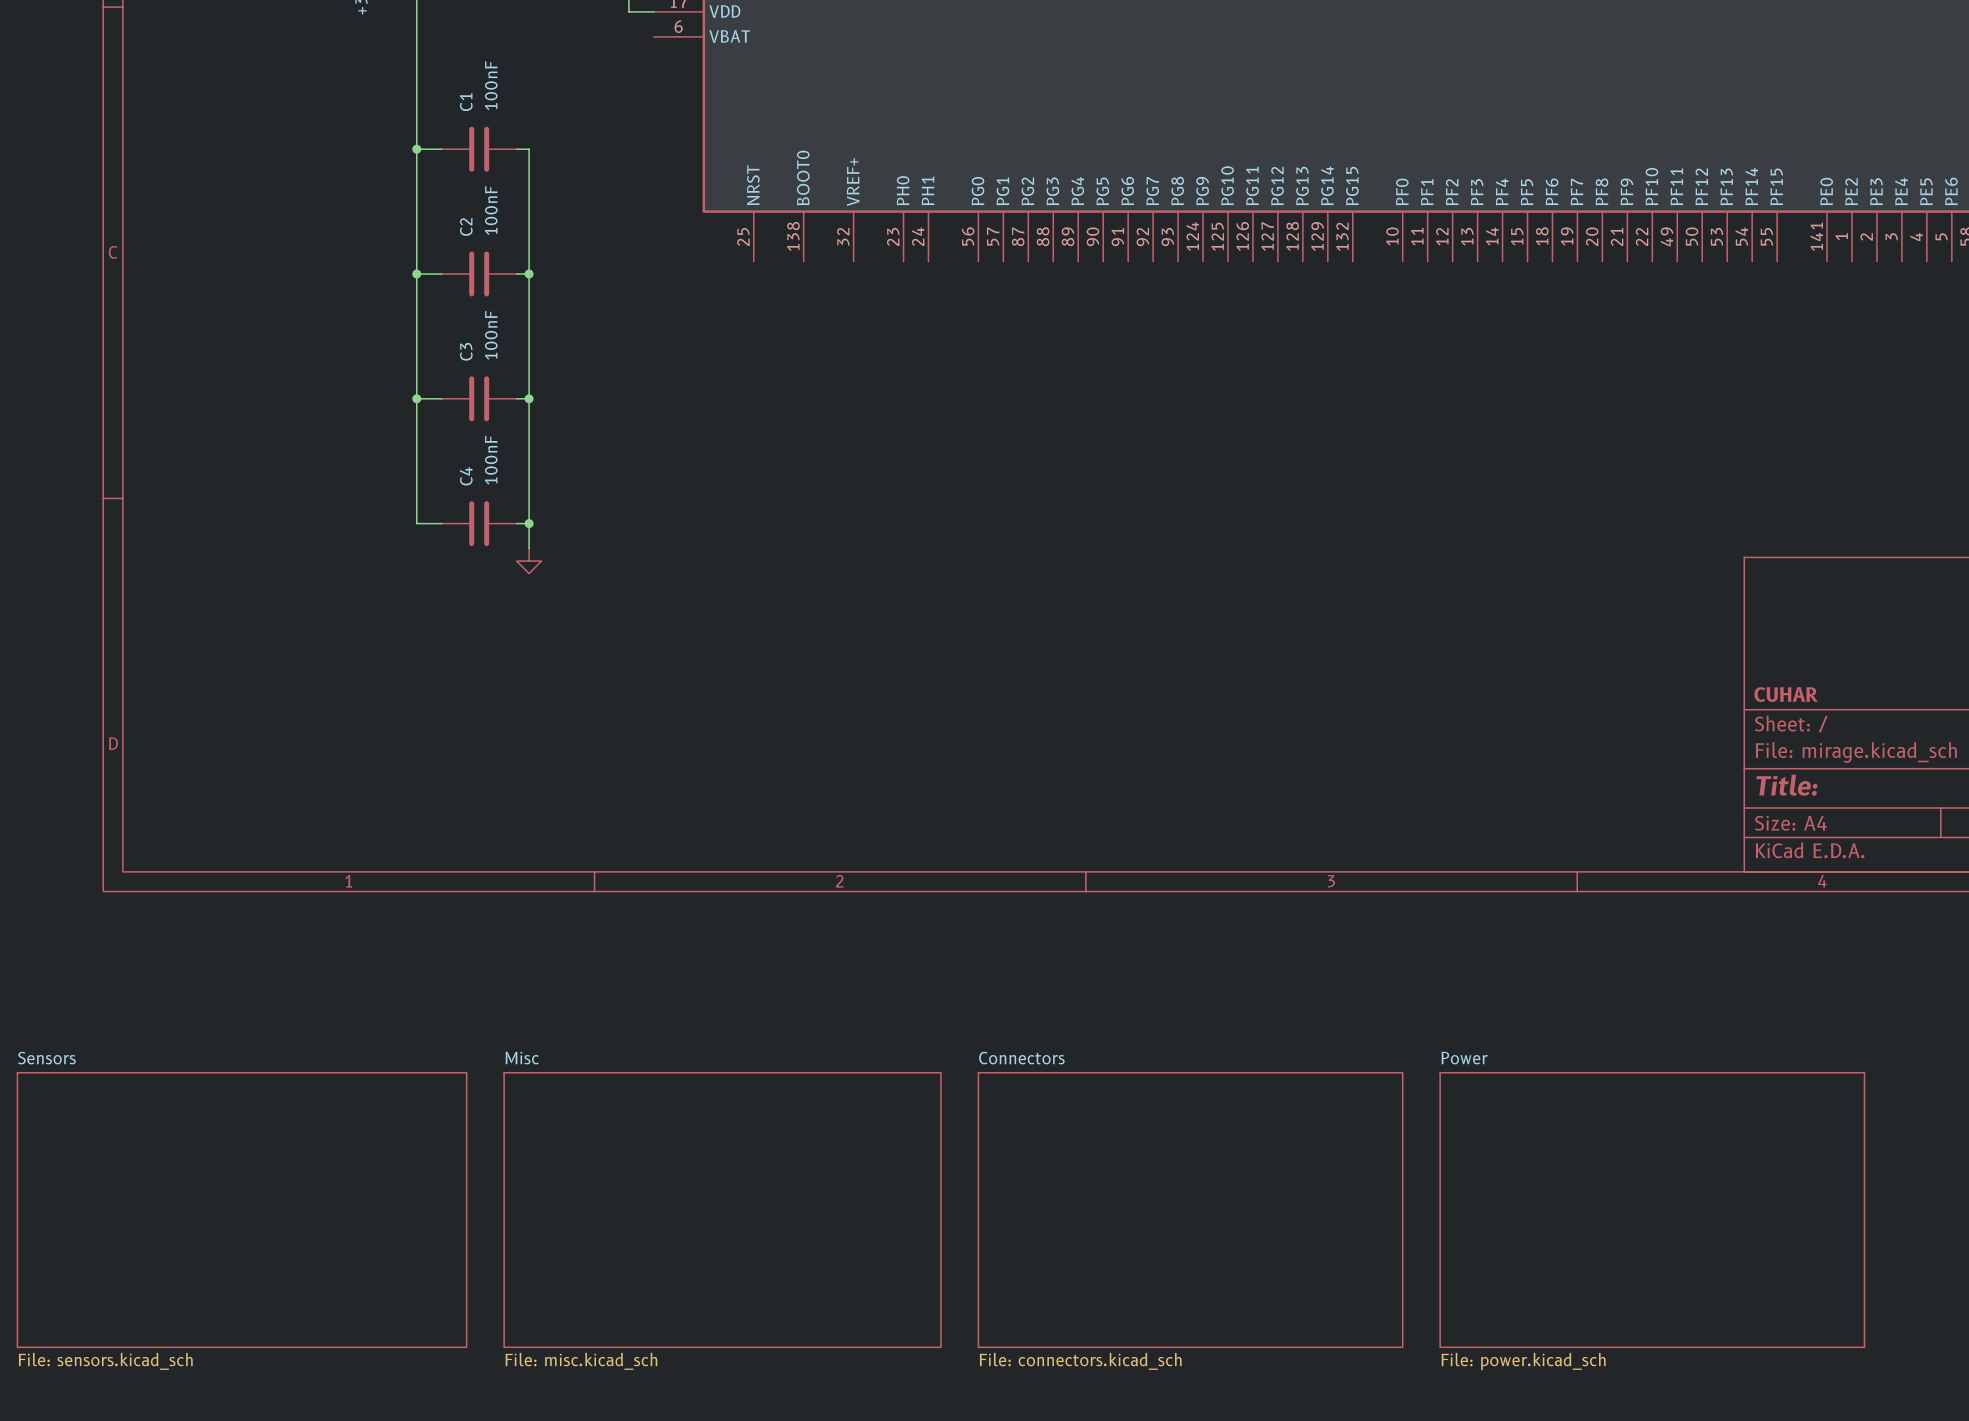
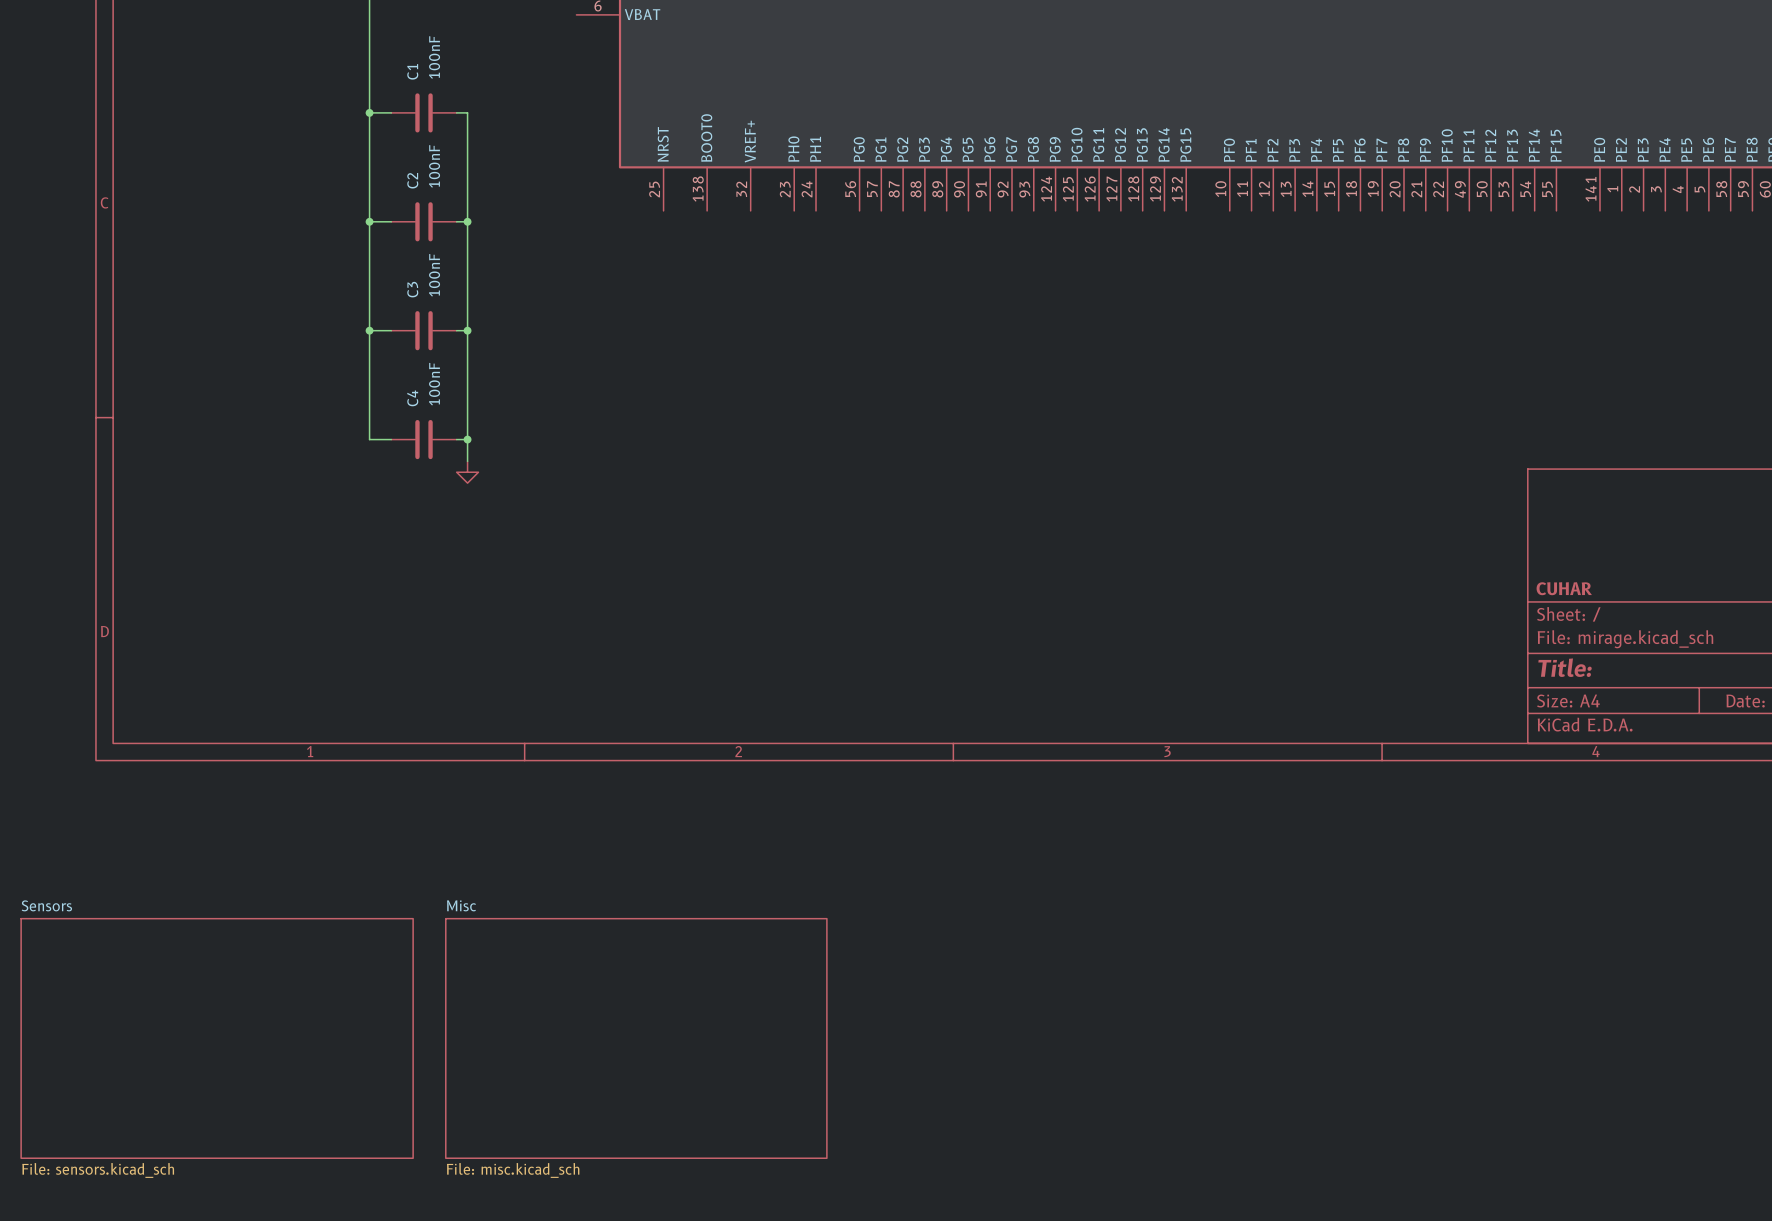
sheet Connectors: File: connectors.kicad_sch (1190, 1210) -> none
sheet Power: File: power.kicad_sch (1652, 1210) -> none

